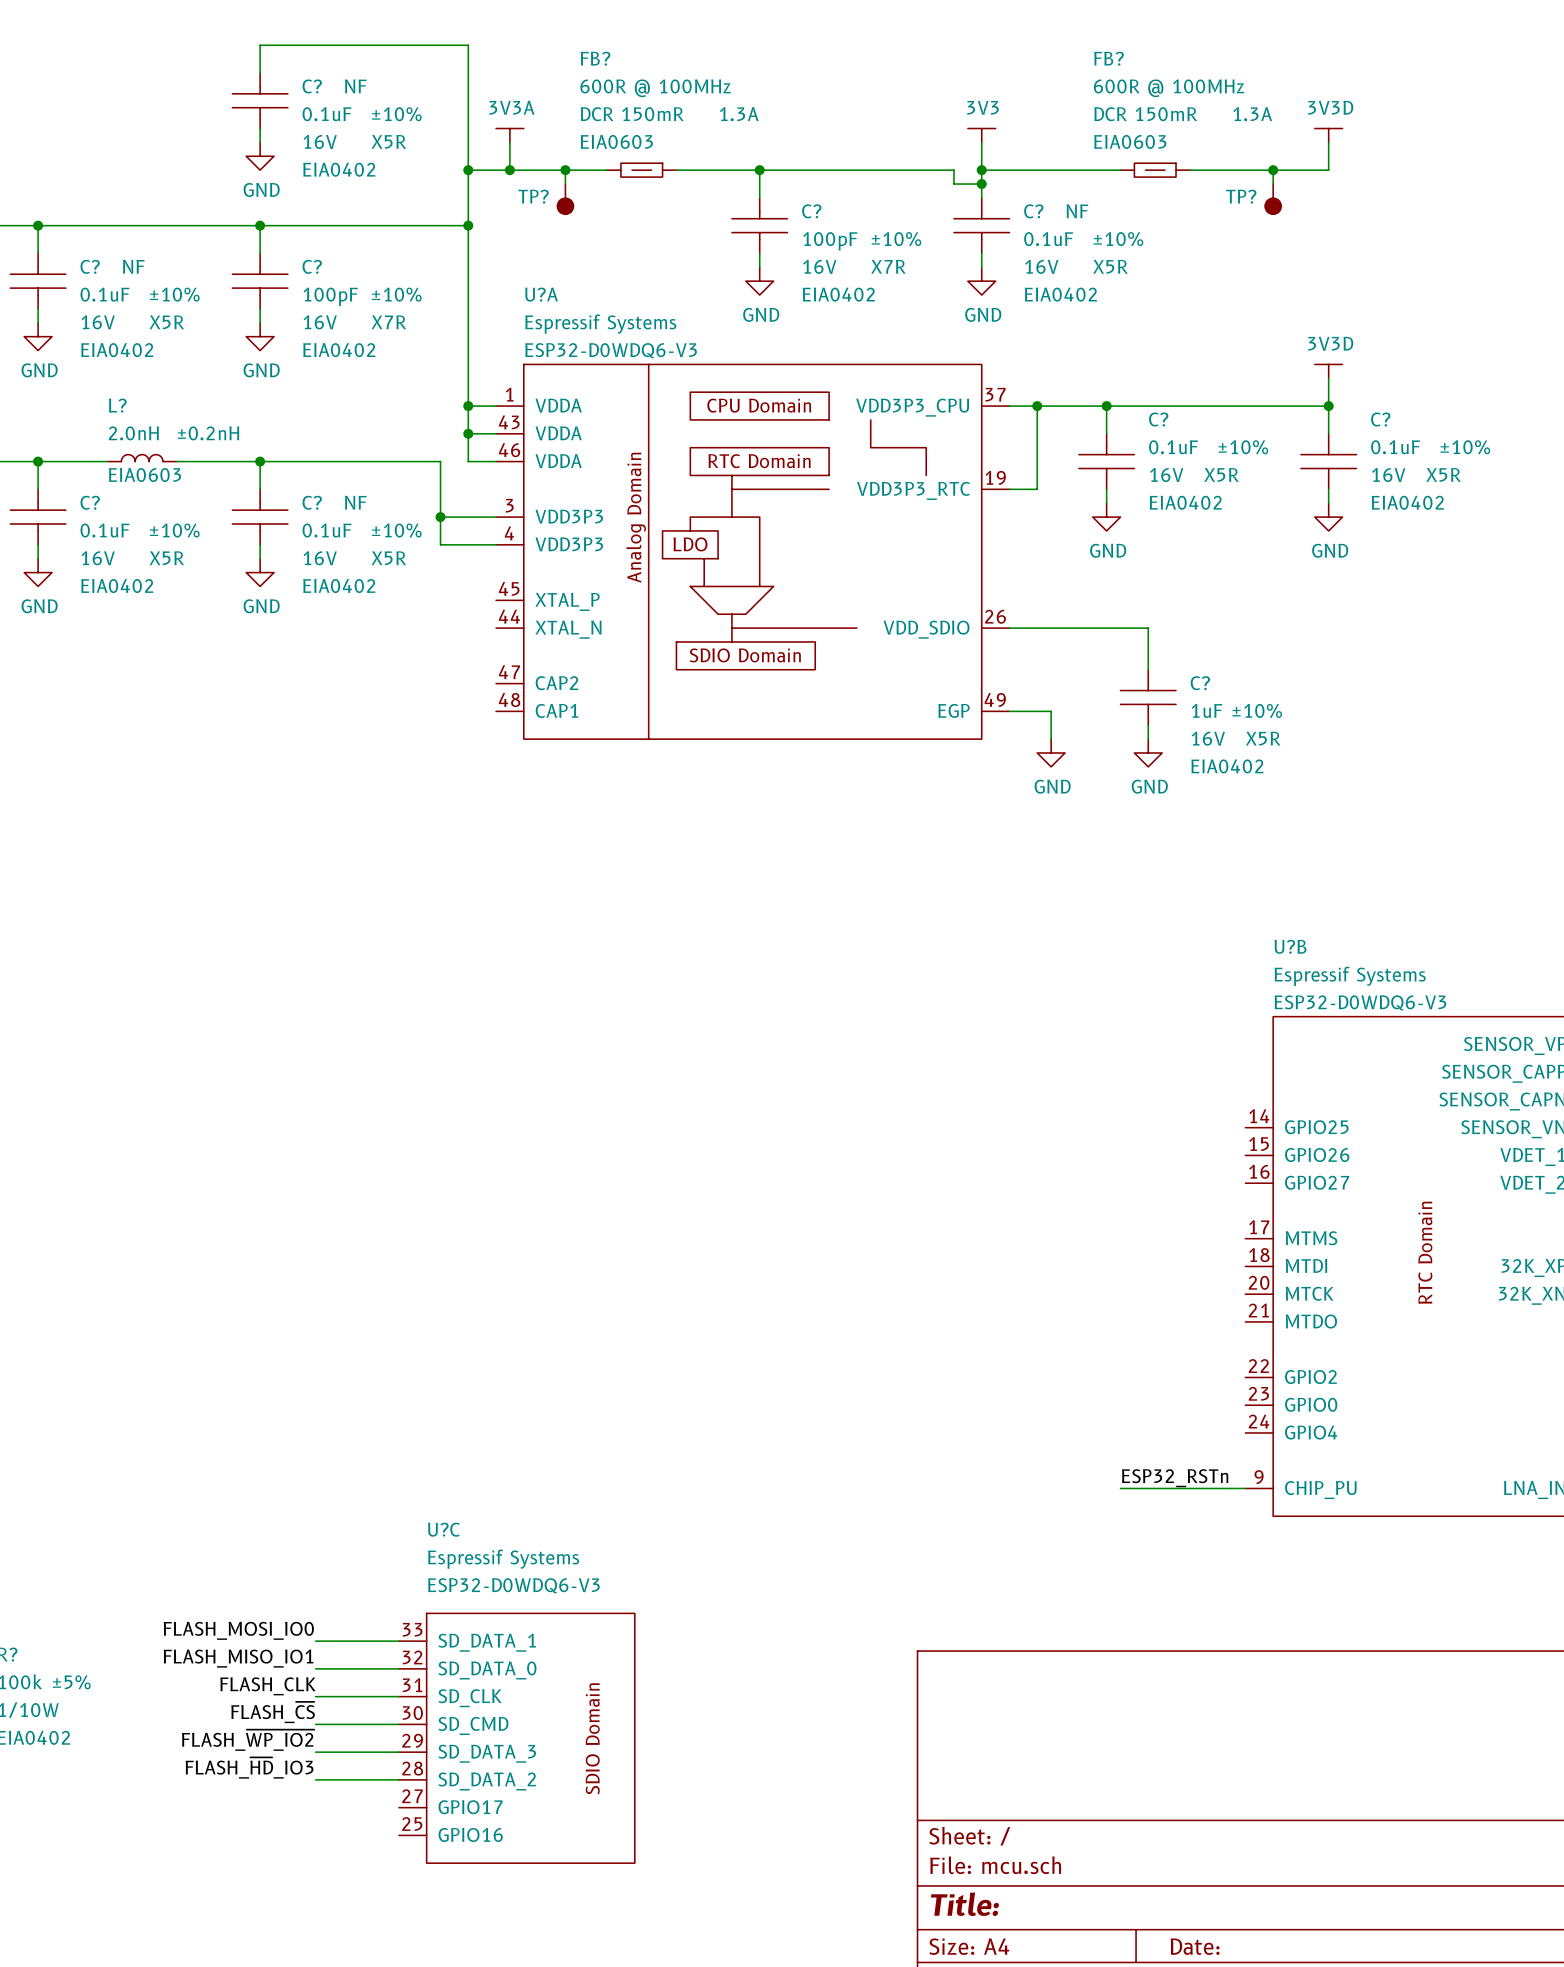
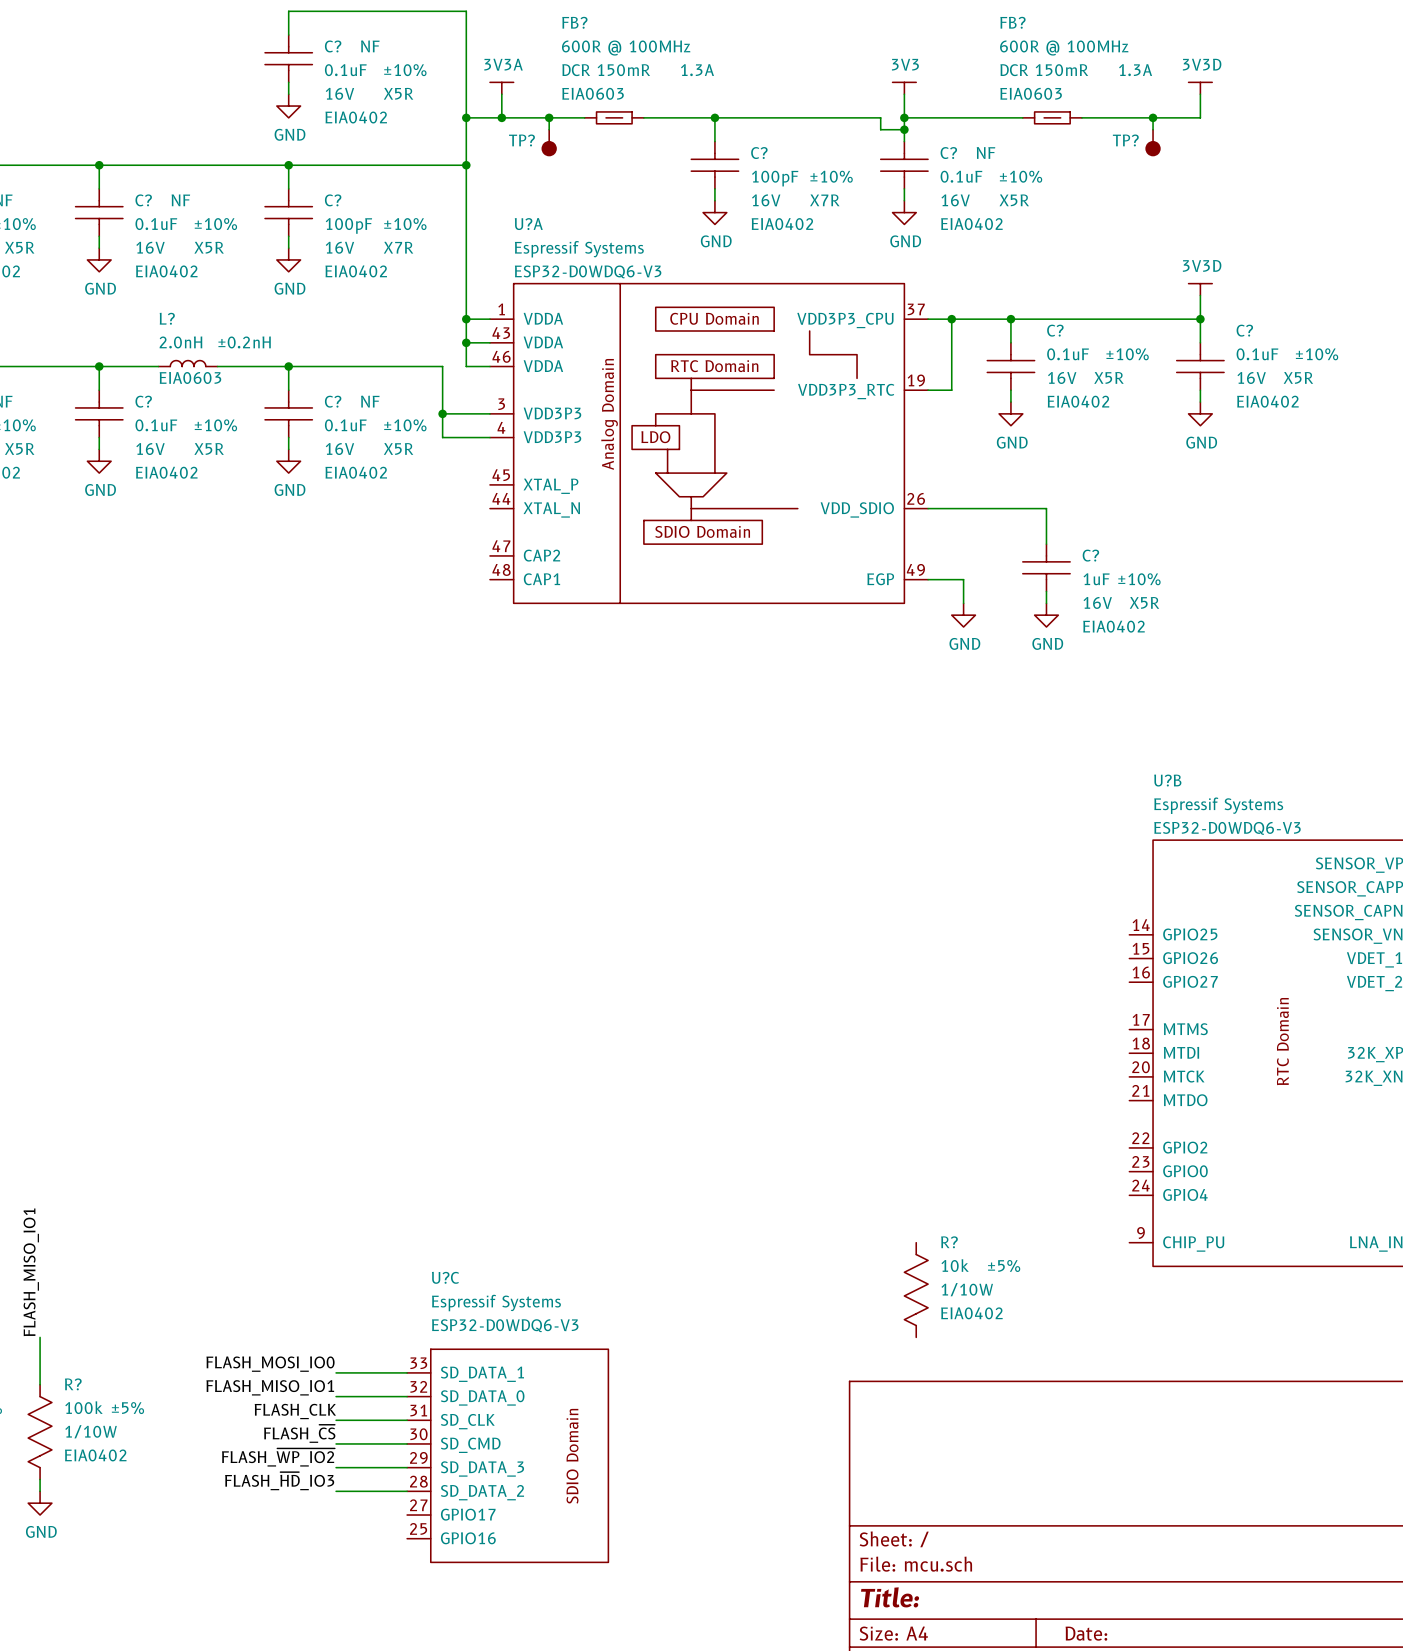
label: ESP32_RSTn (1175, 1478) -> none
wire: (1120, 1488) (1245, 1488) -> none
R?: none -> (916, 1290)

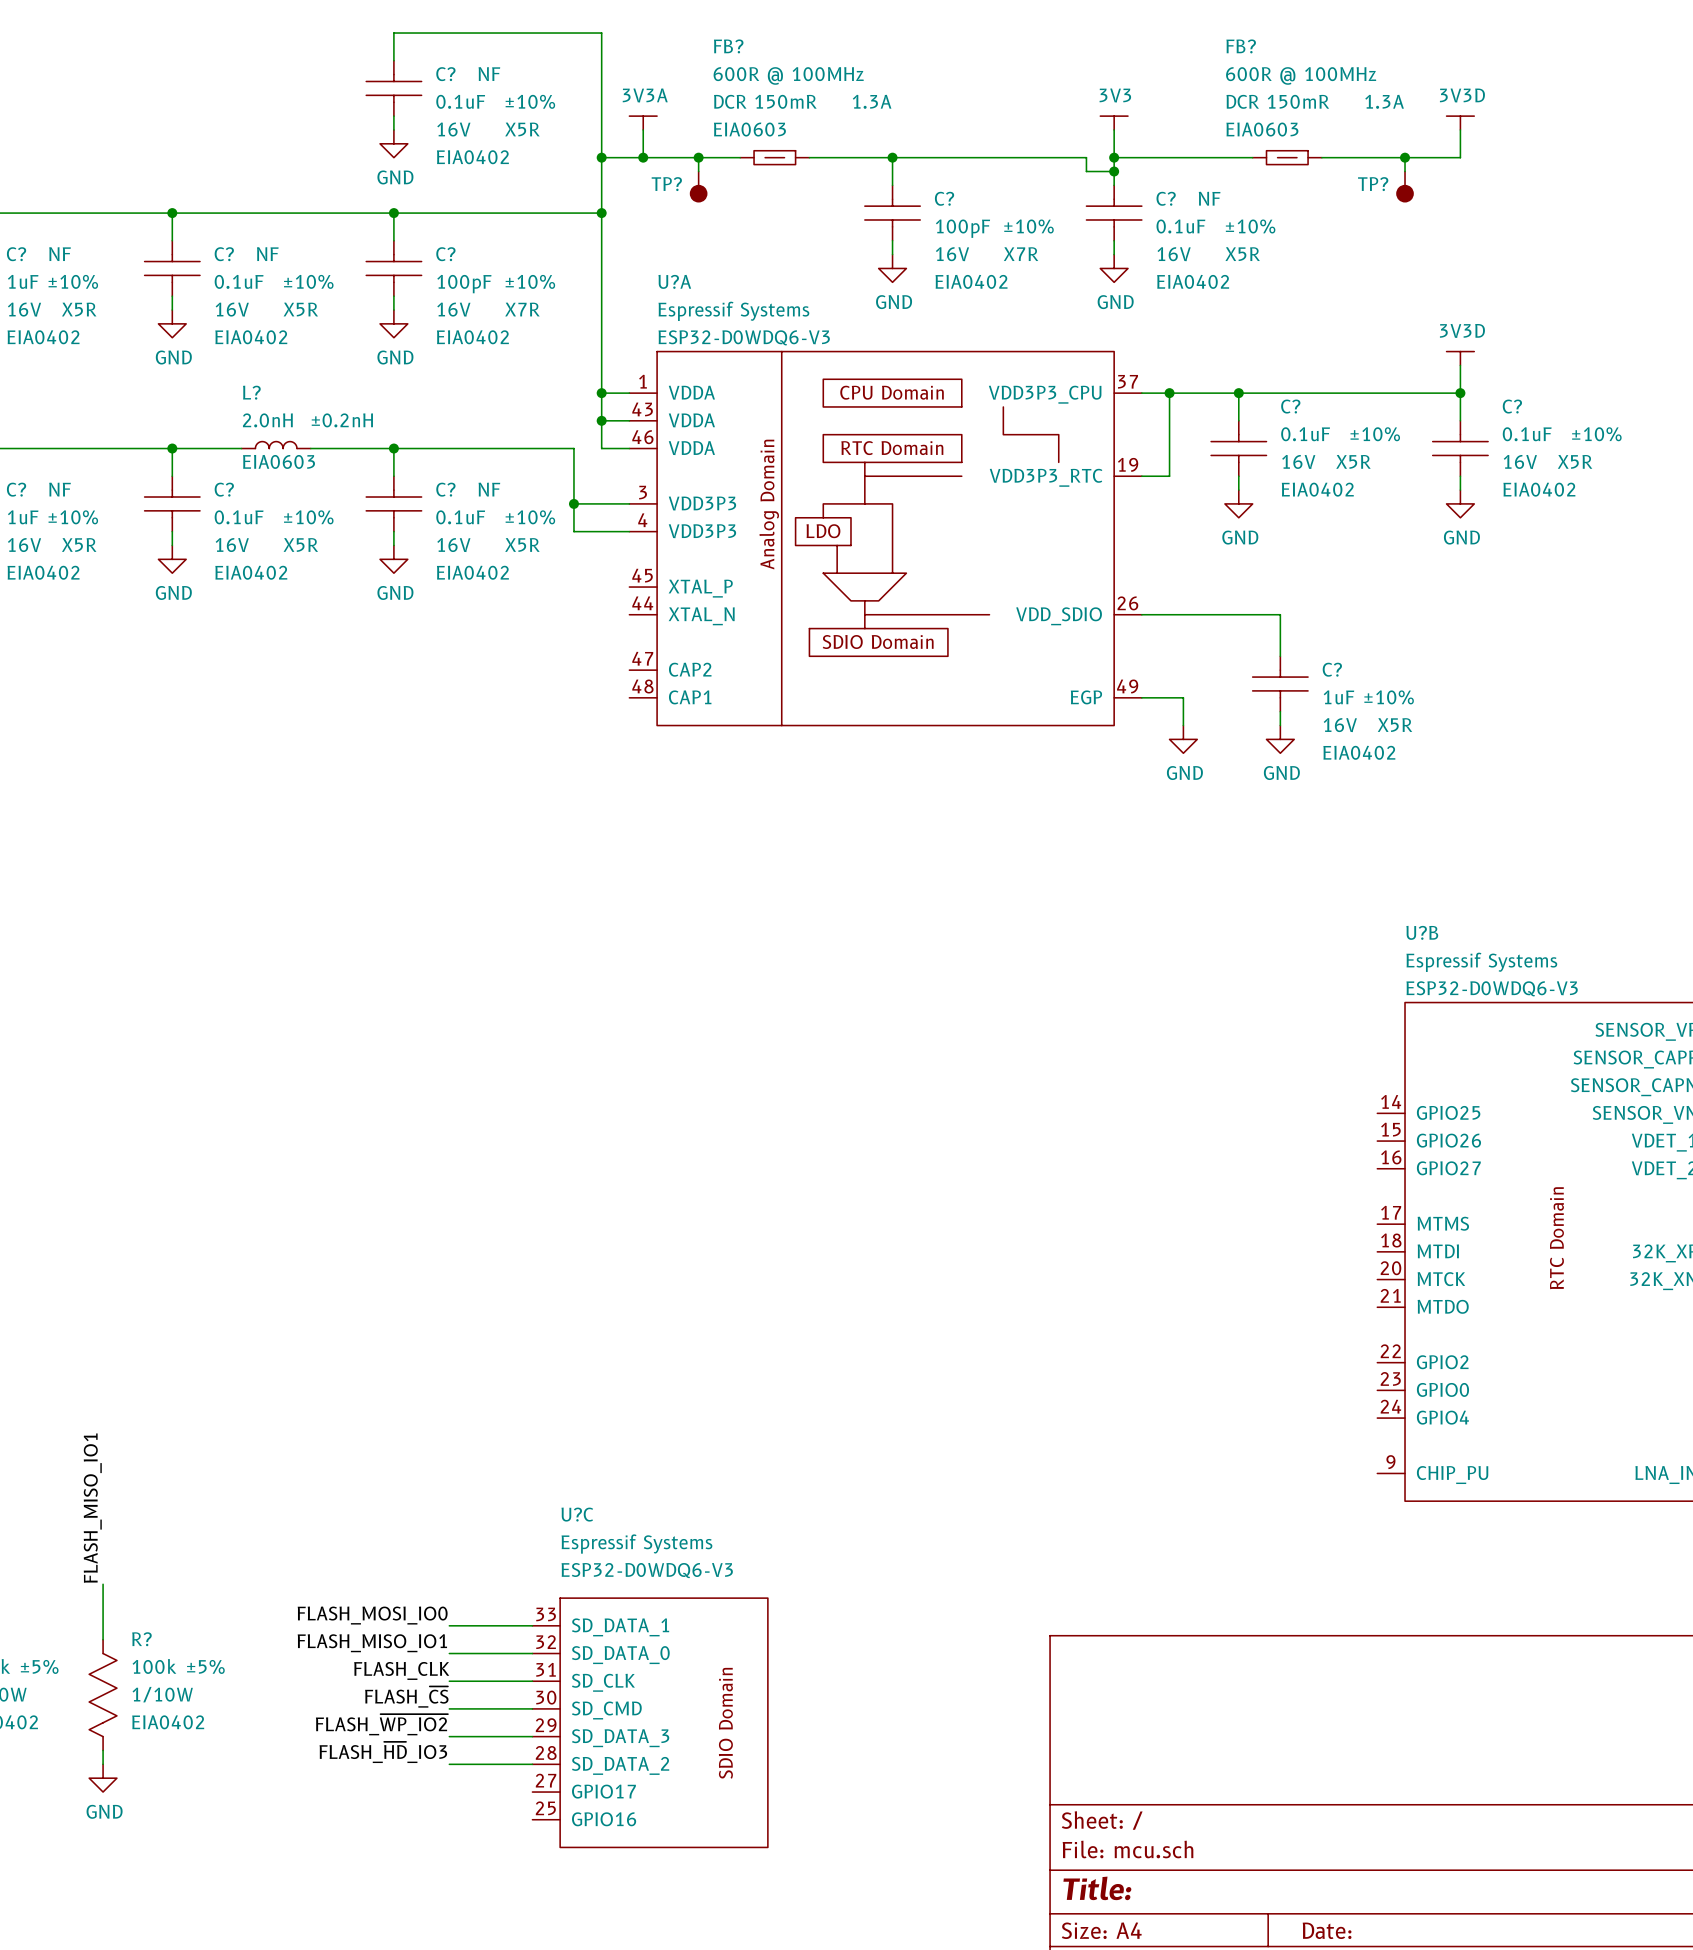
R?: (916, 1290) -> none

